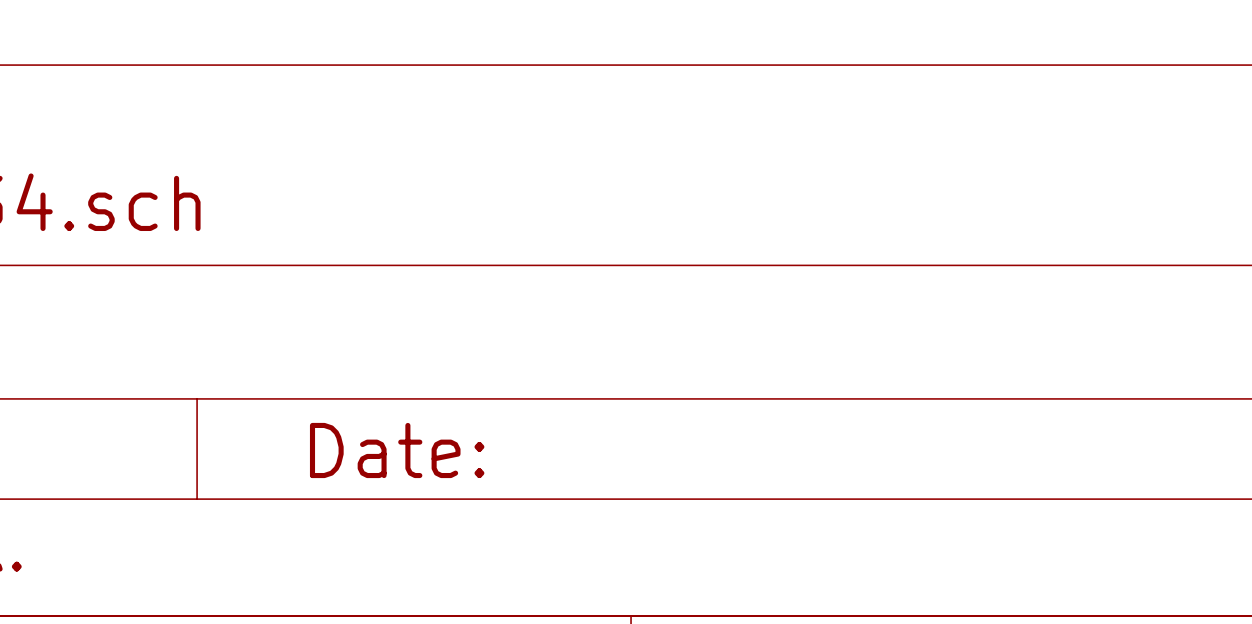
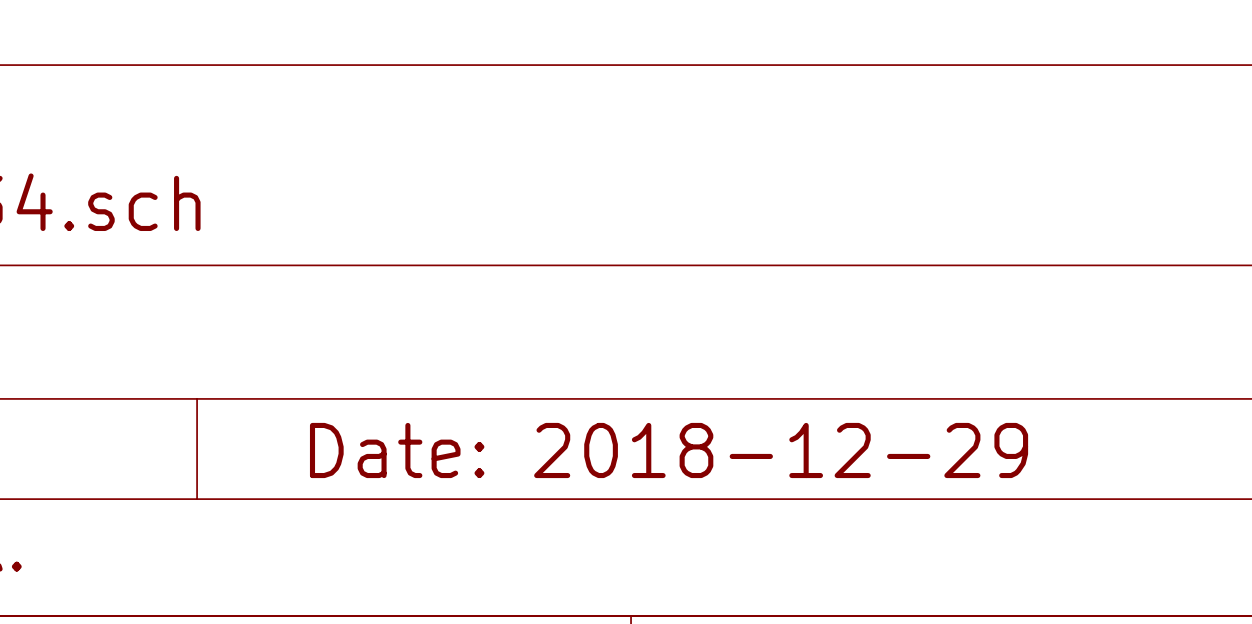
title block: Date: (397, 450) -> Date: 2018-12-29 (669, 450)

